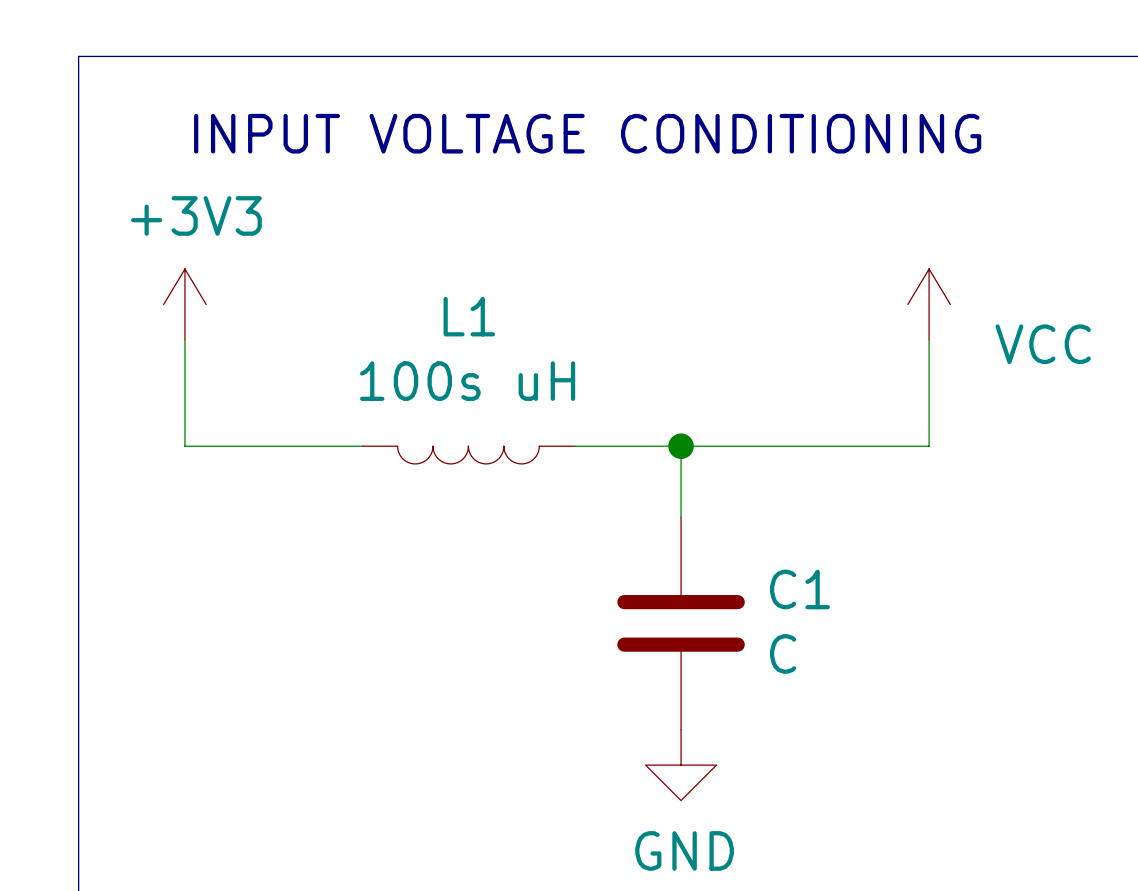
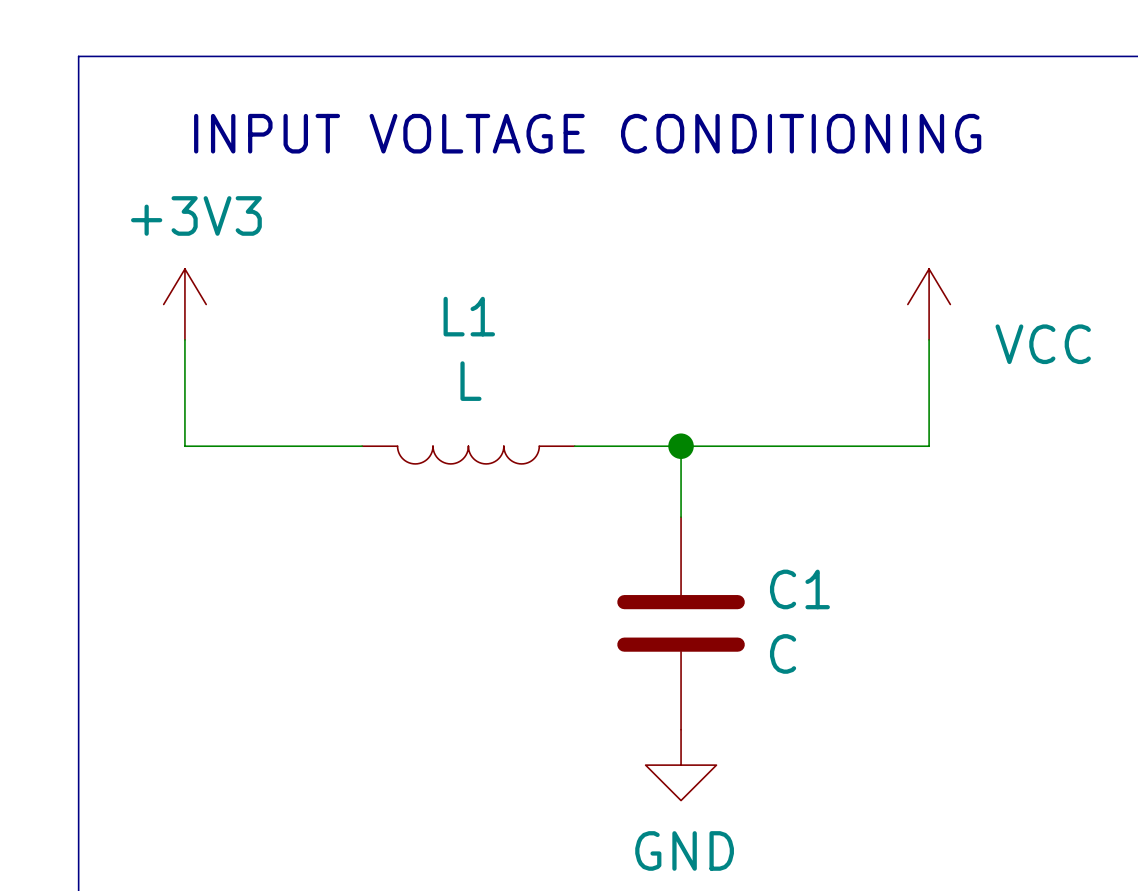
L1 value: 100s uH (467, 381) -> L (470, 381)

